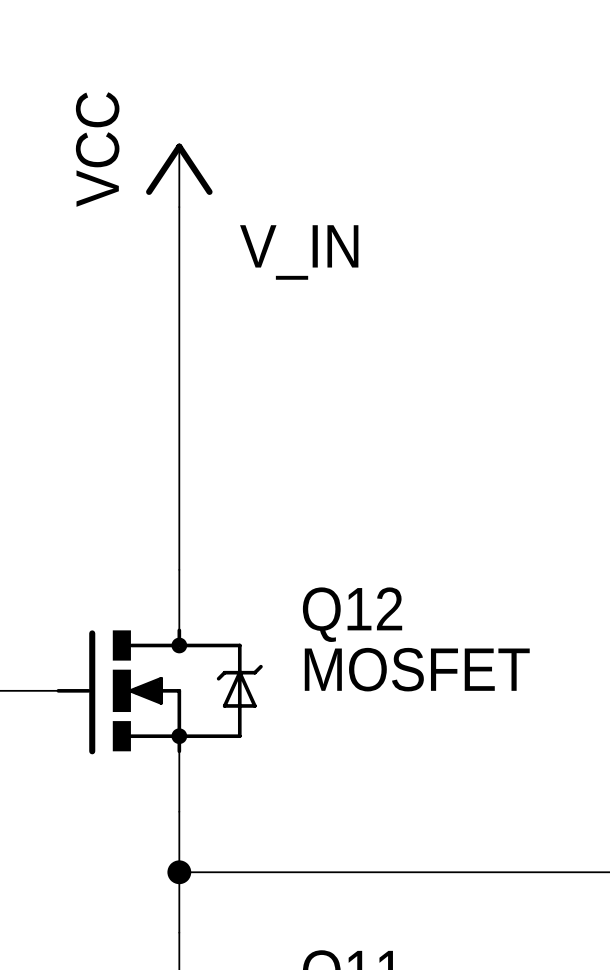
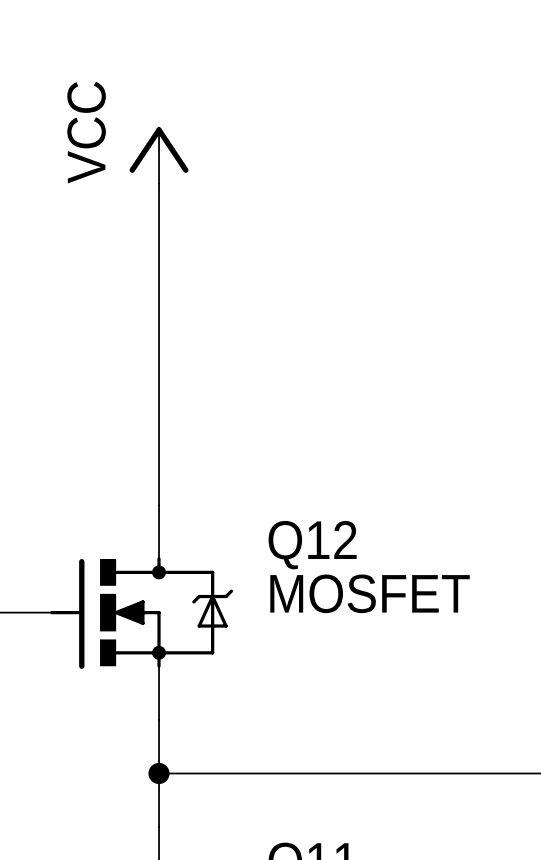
label: V_IN (299, 252) -> none

